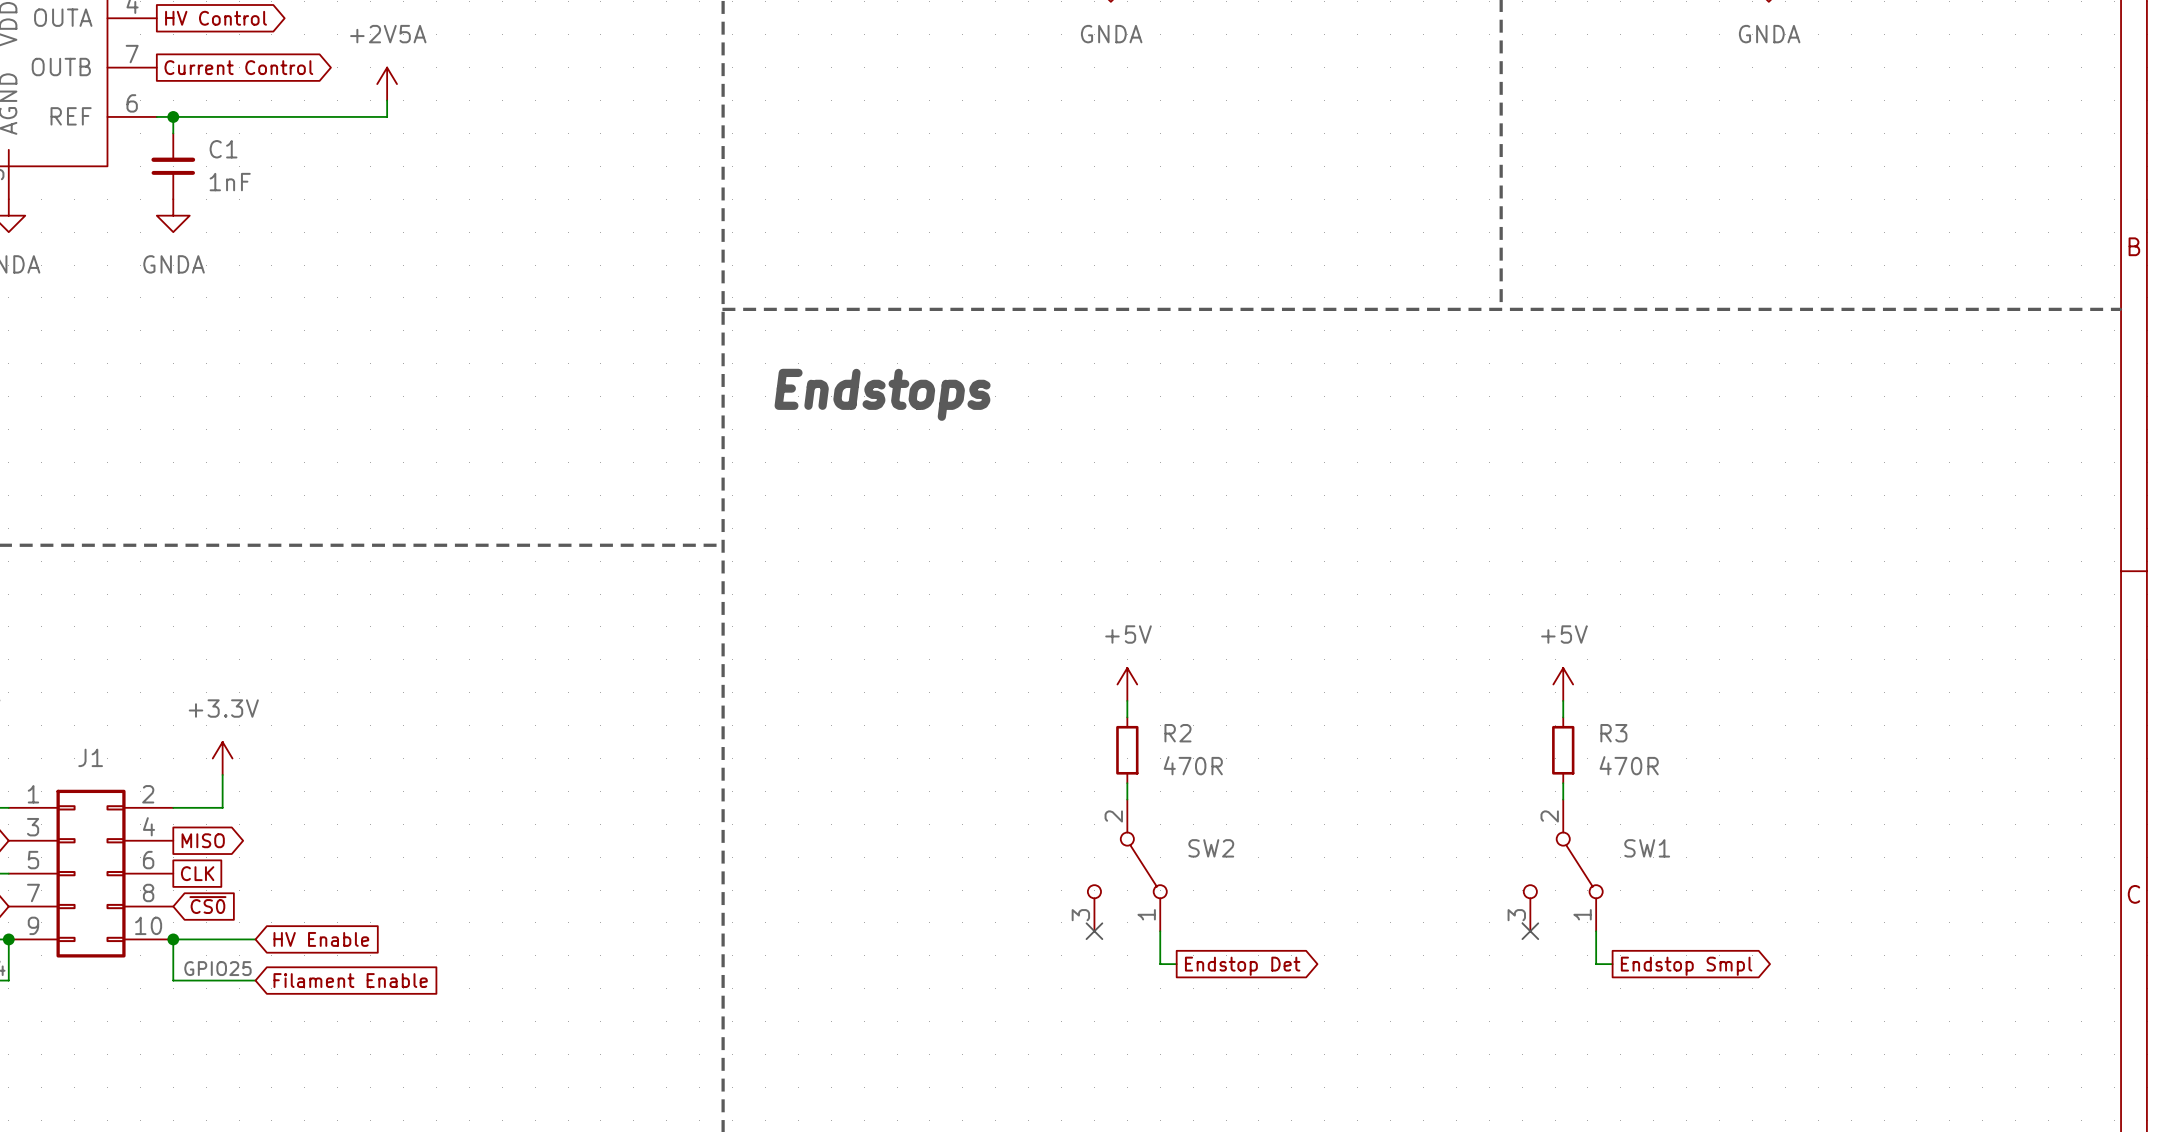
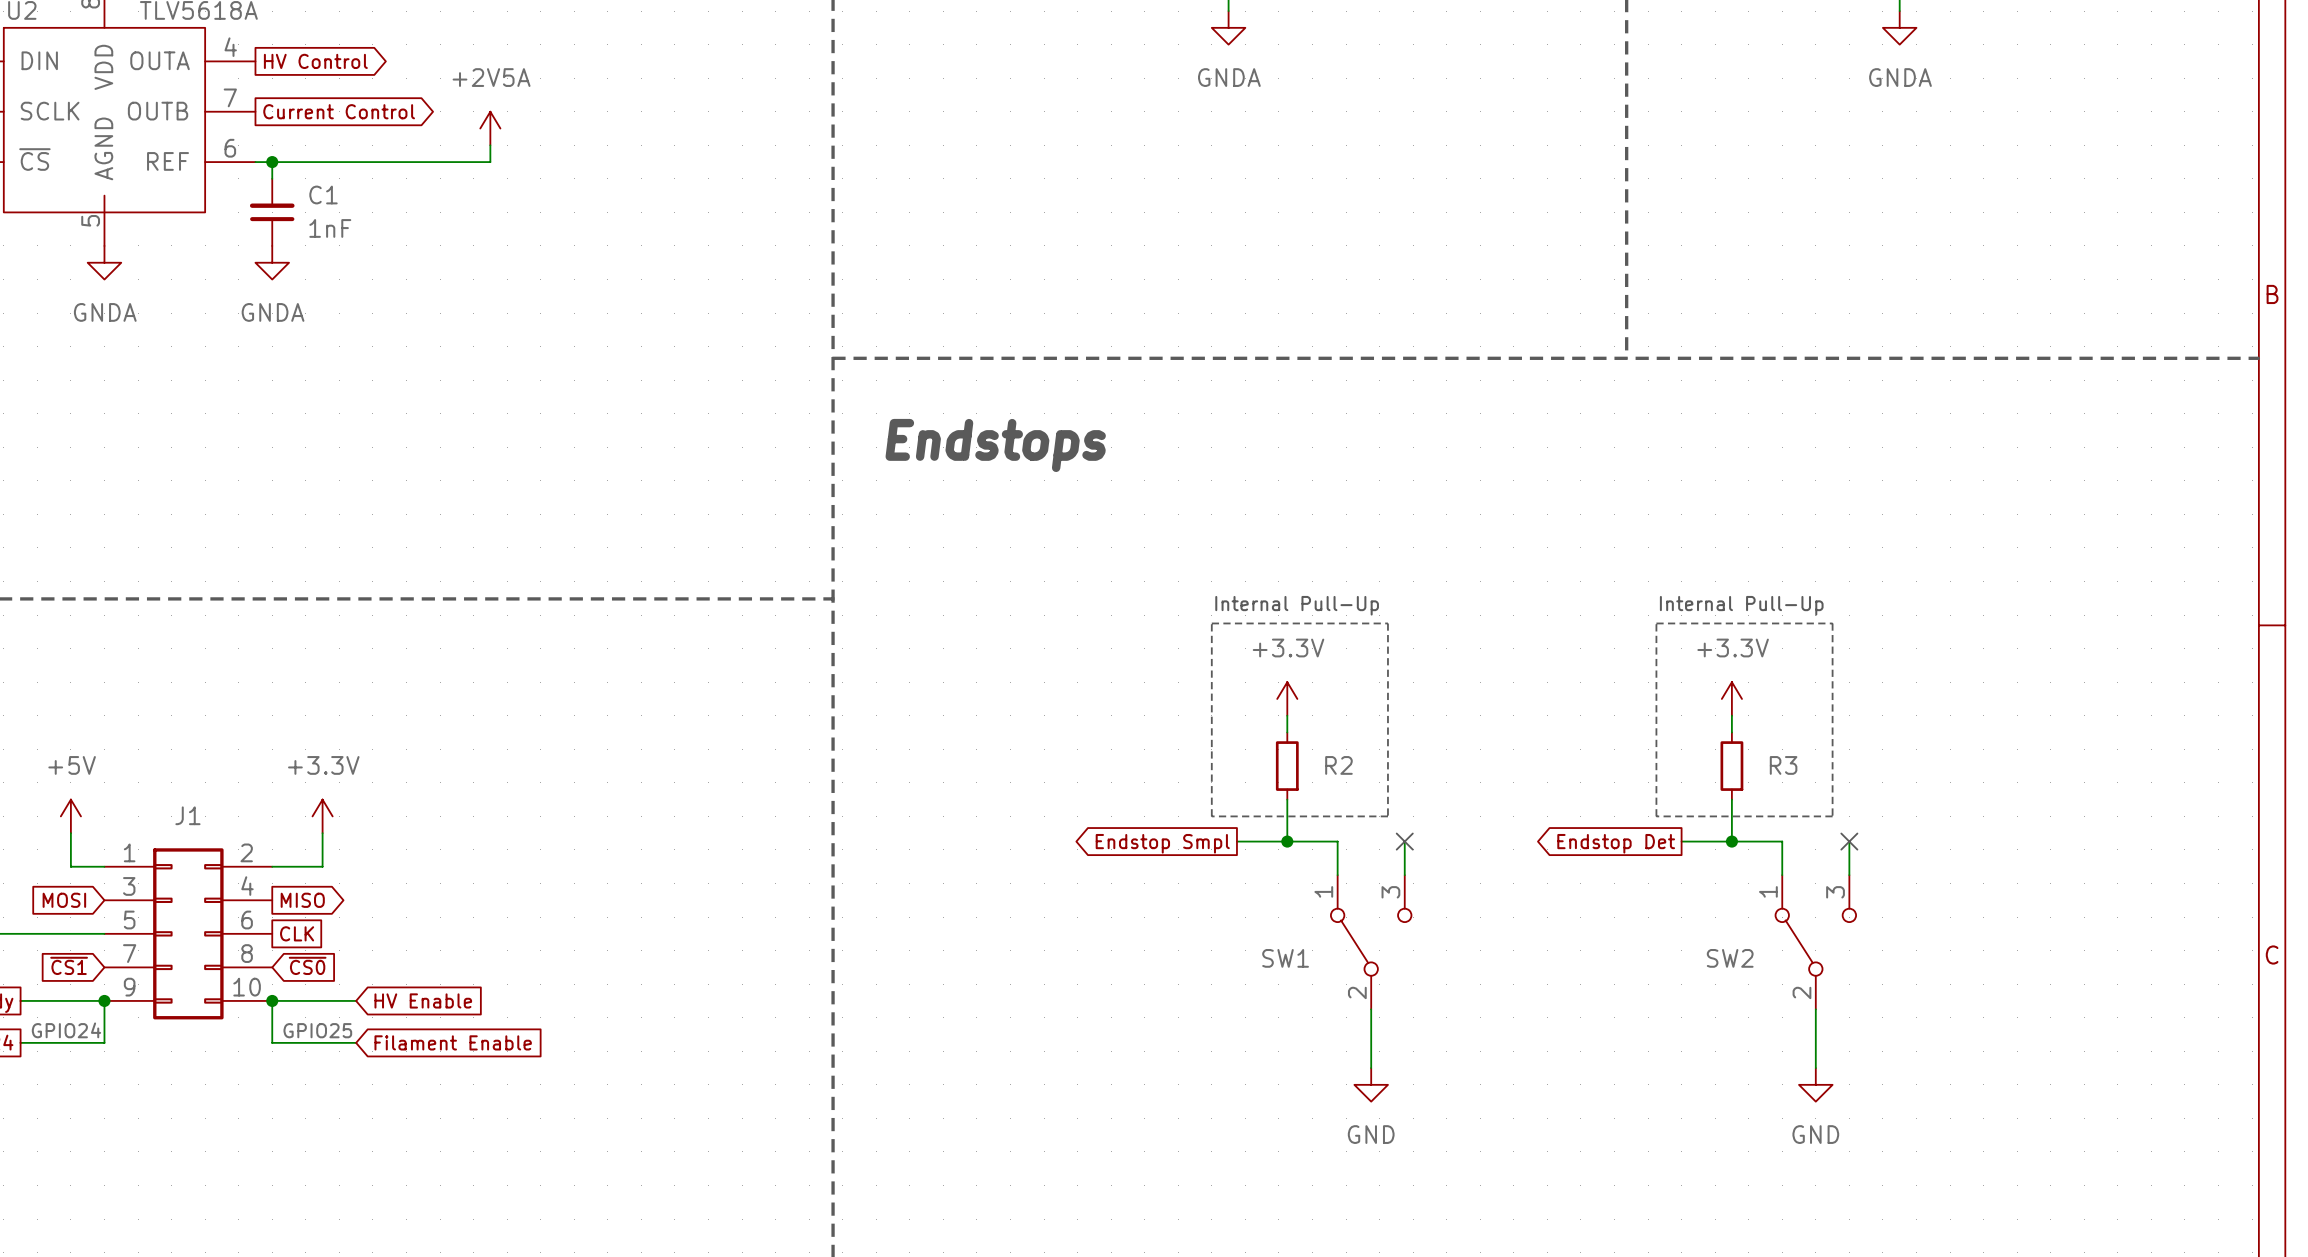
text: none -> Internal Pull-Up (1297, 605)
text: none -> Internal Pull-Up (1741, 605)
line: none -> (1211, 623) (1387, 623) (1387, 816) (1211, 816) (1211, 623)
line: none -> (1656, 623) (1832, 623) (1832, 816) (1656, 816) (1656, 623)
power symbol: none -> +3.3V (1287, 698)
power symbol: none -> +3.3V (1731, 698)
power symbol: +5V (1127, 684) -> none
power symbol: +5V (1563, 684) -> none
wire: (1127, 700) (1127, 717) -> (1287, 715) (1287, 732)
wire: (1563, 700) (1563, 717) -> (1731, 715) (1731, 732)
R2 name position: R2 (1177, 733) -> R2 (1338, 765)
R3 name position: R3 (1613, 733) -> R3 (1783, 765)
wire: none -> (1287, 799) (1287, 841)
wire: none -> (1731, 799) (1731, 841)
R2 position: (1127, 750) -> (1287, 766)
R3 position: (1563, 750) -> (1731, 766)
R2 value: 470R (1193, 765) -> none
R3 value: 470R (1629, 765) -> none
wire: none -> (1236, 841) (1337, 841) (1337, 875)
wire: (1127, 783) (1127, 799) -> none
junction: none -> (1287, 841)
wire: none -> (1404, 841) (1404, 875)
no-connect mark: none -> (1404, 841)
wire: none -> (1681, 841) (1782, 841) (1782, 875)
wire: (1563, 783) (1563, 799) -> none
junction: none -> (1731, 841)
wire: none -> (1849, 841) (1849, 875)
no-connect mark: none -> (1849, 841)
global label: none -> Endstop Smpl (1162, 843)
global label: none -> Endstop Det (1616, 843)
SW2 rotation: 0° (1127, 865) -> 180° (1815, 942)
SW2 position: (1127, 865) -> (1815, 942)
SW1 rotation: 0° (1563, 865) -> 180° (1371, 942)
SW1 position: (1563, 865) -> (1371, 942)
no-connect mark: (1094, 931) -> none
wire: (1160, 931) (1160, 964) (1176, 964) -> none
no-connect mark: (1530, 931) -> none
wire: (1596, 931) (1596, 964) (1612, 964) -> none
wire: none -> (1371, 1009) (1371, 1068)
wire: none -> (1815, 1009) (1815, 1068)
global label: Endstop Det (1242, 966) -> none
global label: Endstop Smpl (1686, 966) -> none
power symbol: none -> GND (1371, 1084)
power symbol: none -> GND (1815, 1084)

